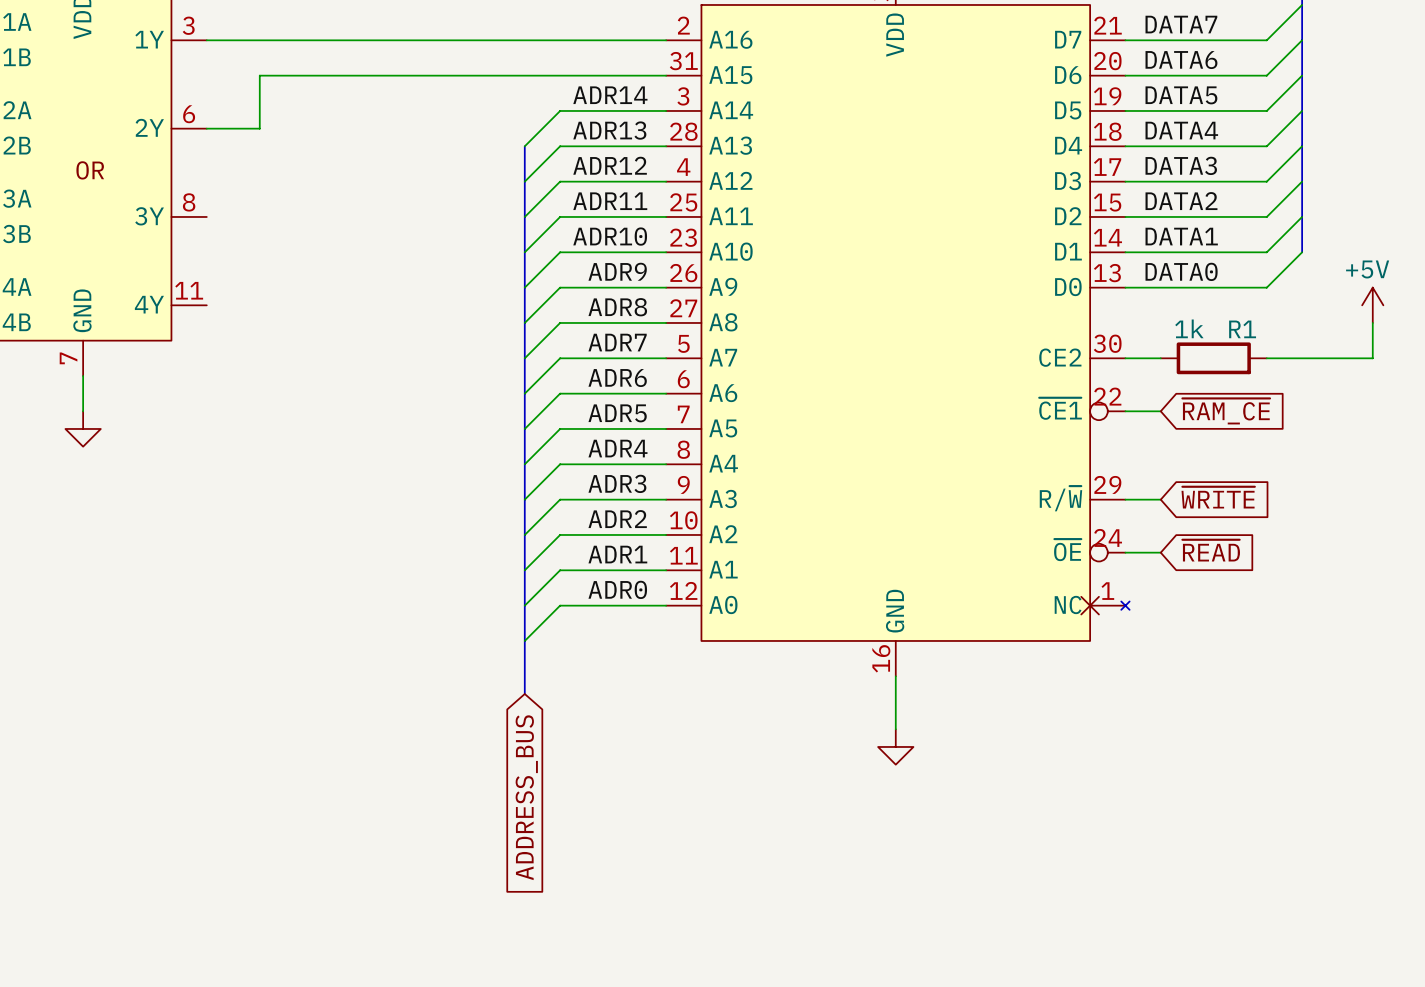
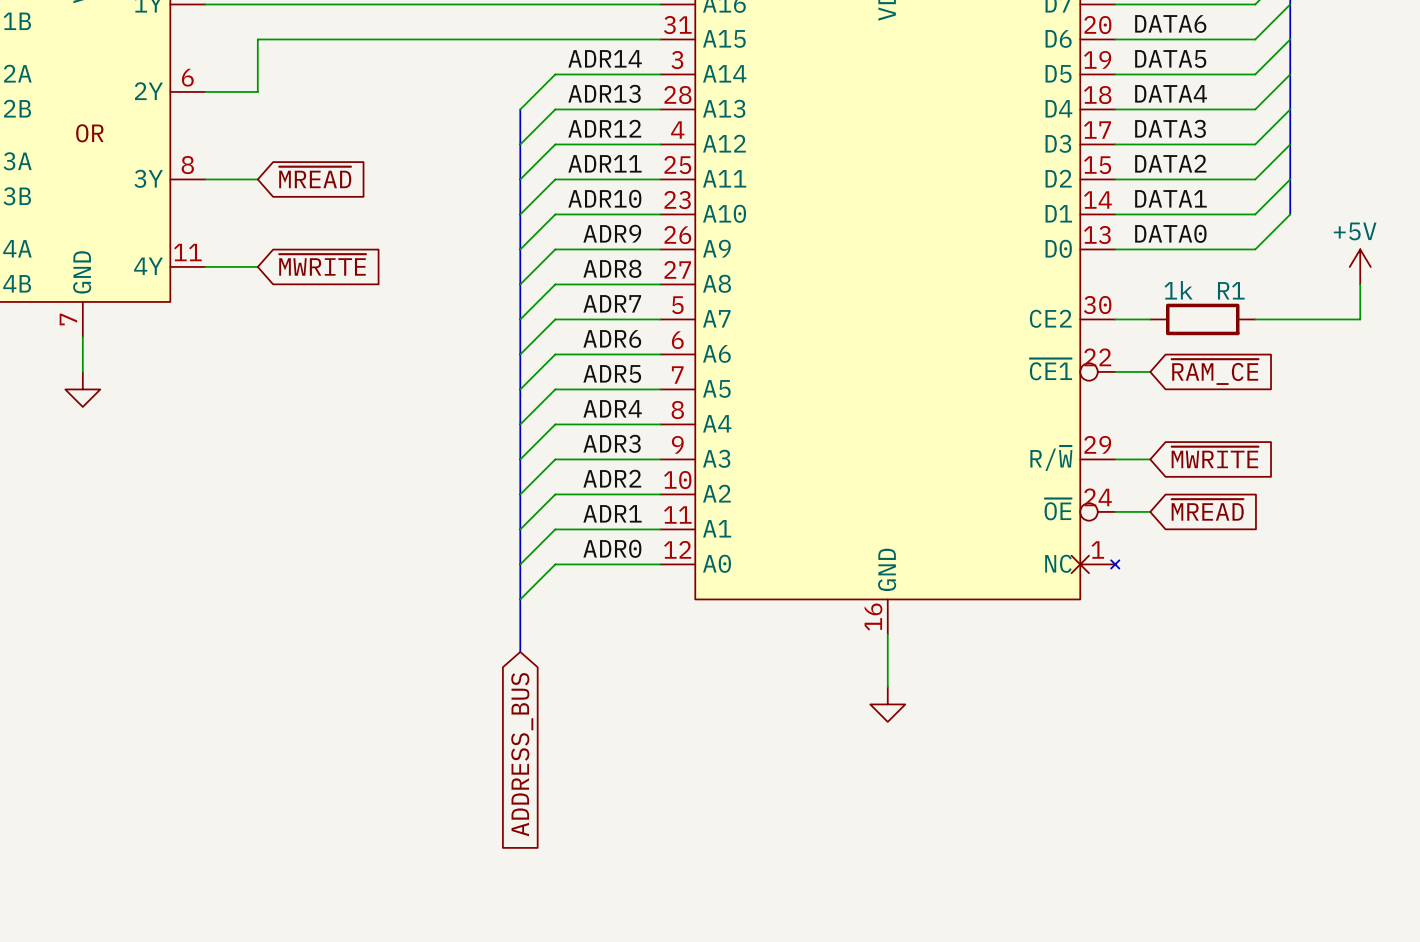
global label: none -> ~{MREAD} (315, 177)
wire: none -> (205, 179) (257, 179)
global label: none -> ~{MWRITE} (322, 264)
wire: none -> (205, 266) (257, 266)
global label: ~{WRITE} (1218, 497) -> ~{MWRITE} (1215, 457)
global label: ~{READ} (1211, 550) -> ~{MREAD} (1207, 509)

